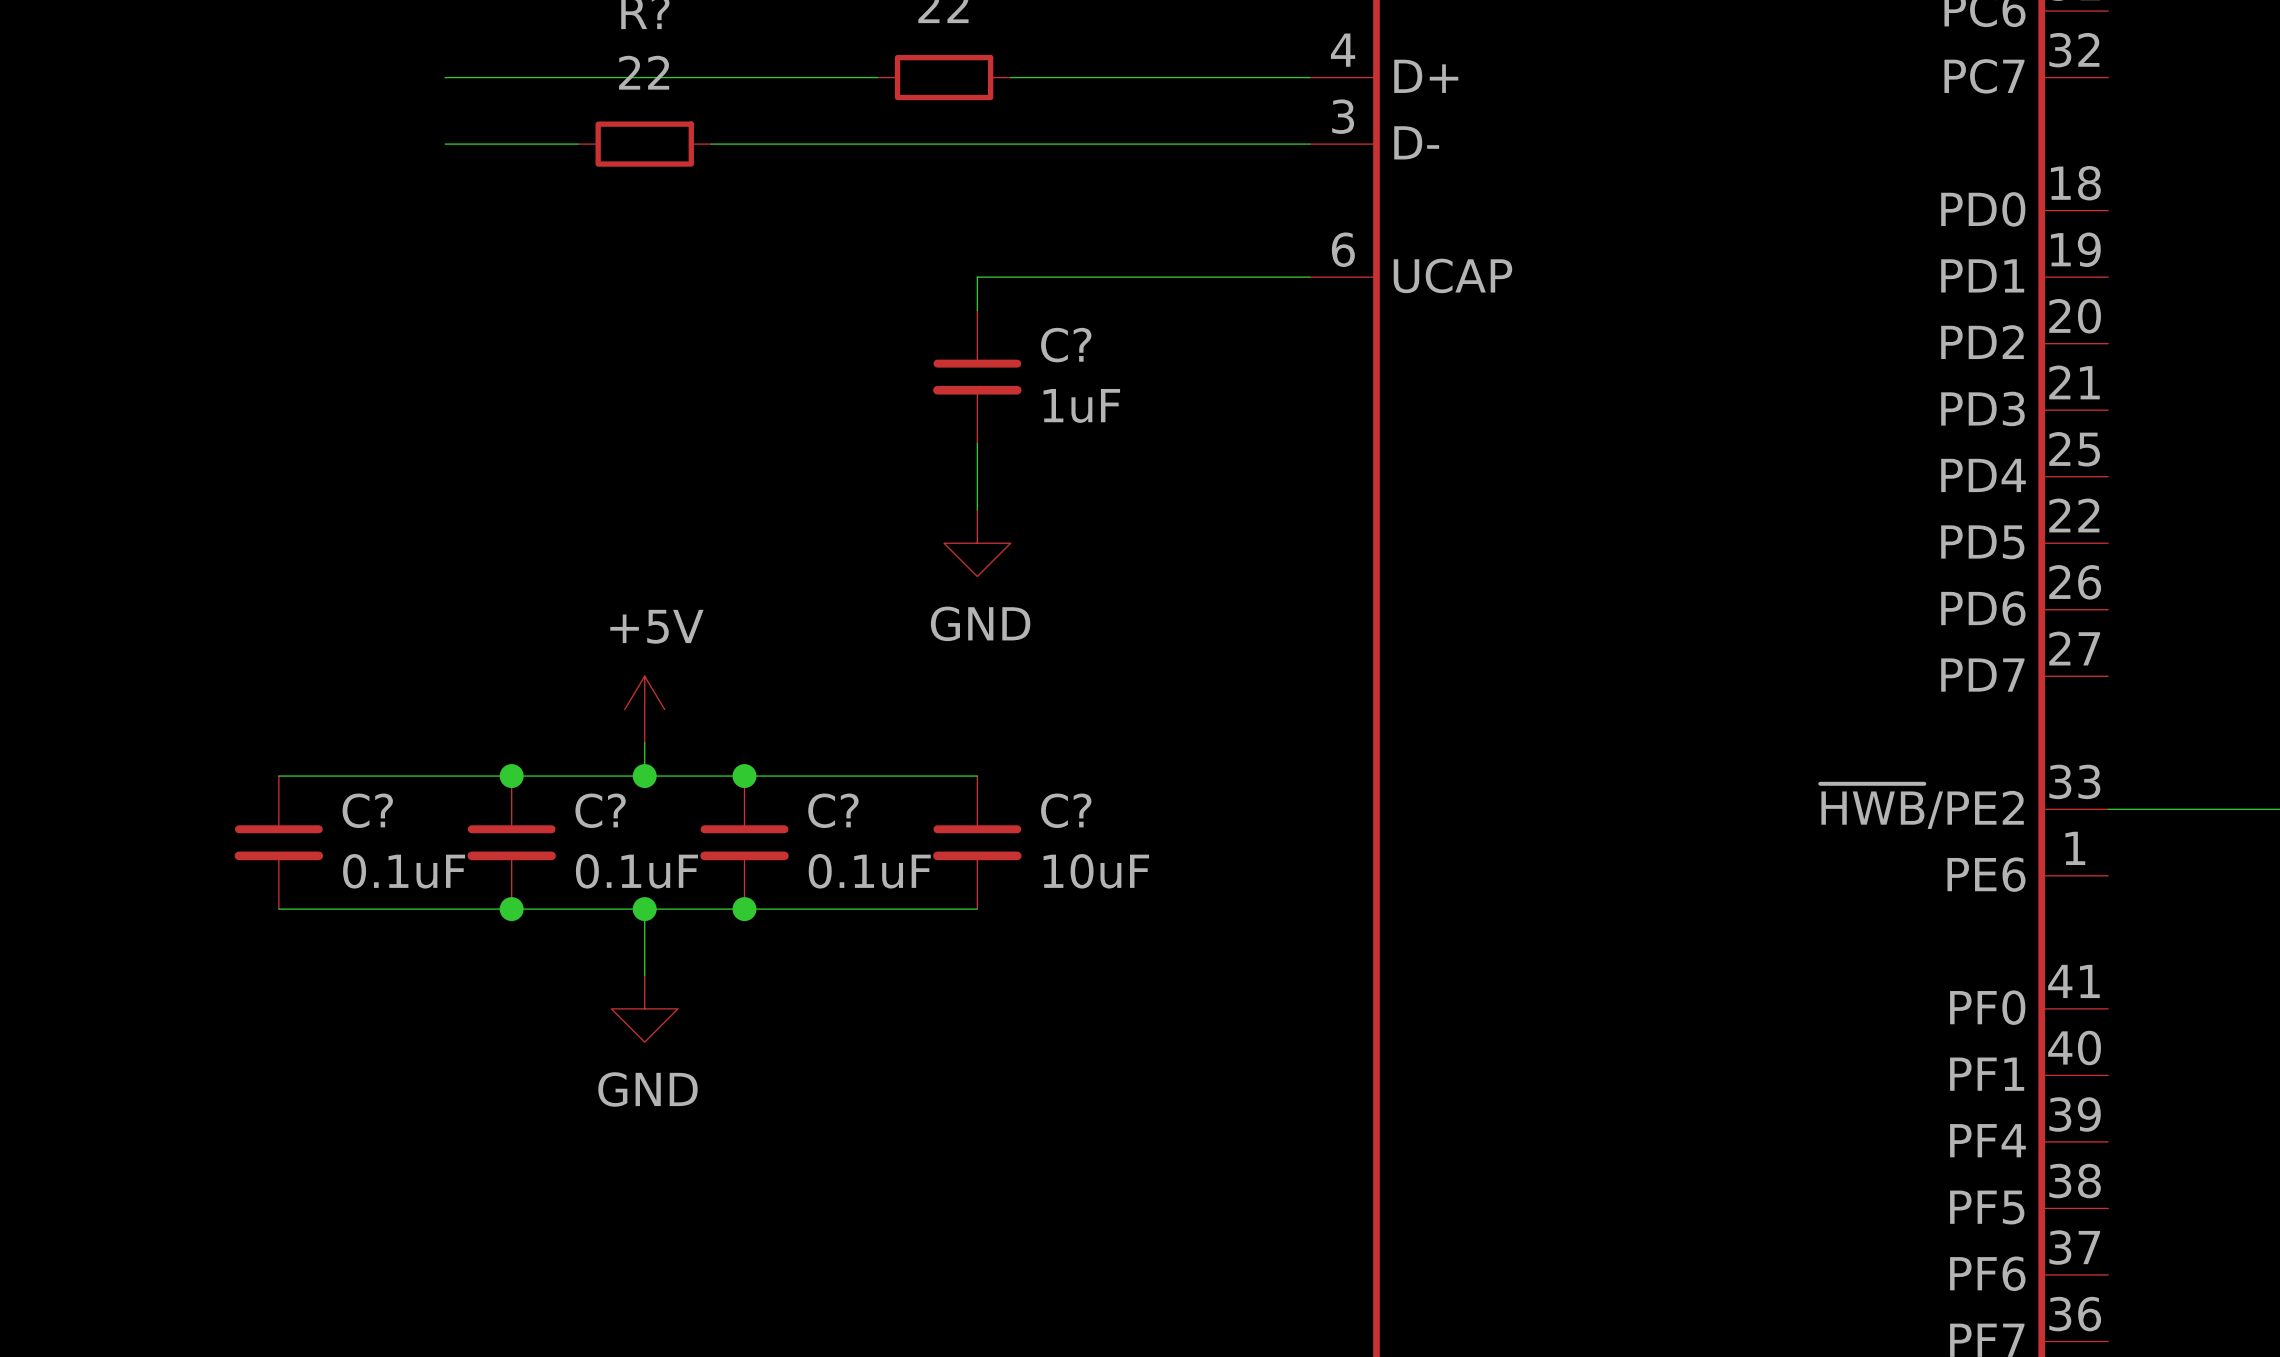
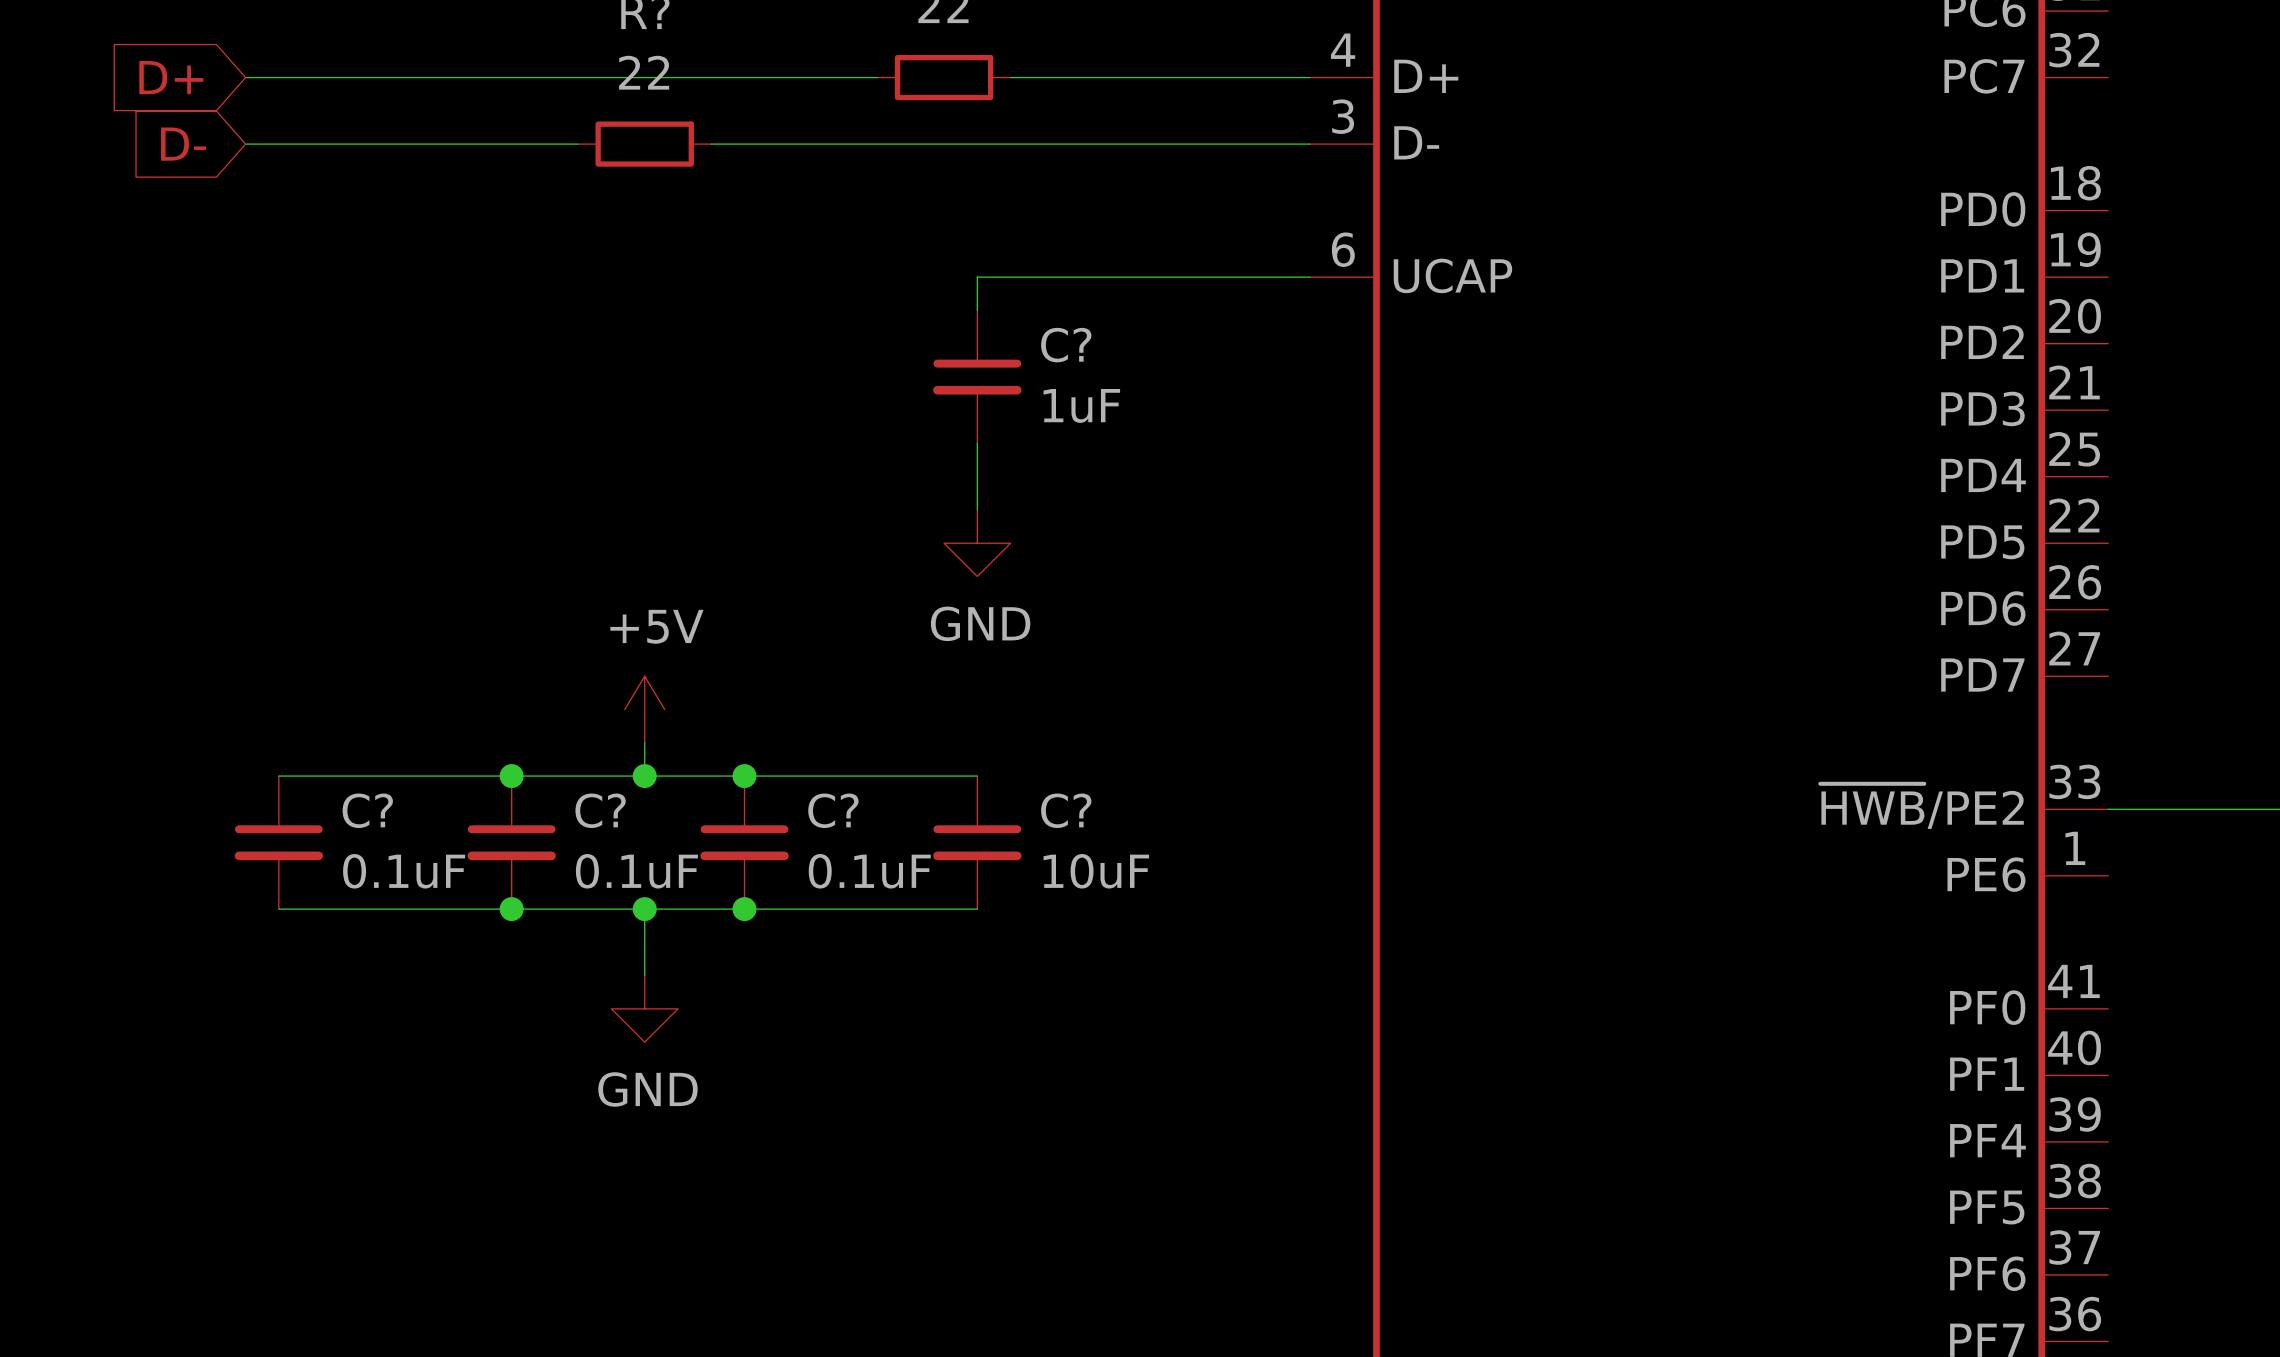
global label: none -> D+ (171, 77)
wire: none -> (245, 77) (445, 77)
global label: none -> D- (183, 144)
wire: none -> (245, 144) (445, 144)

